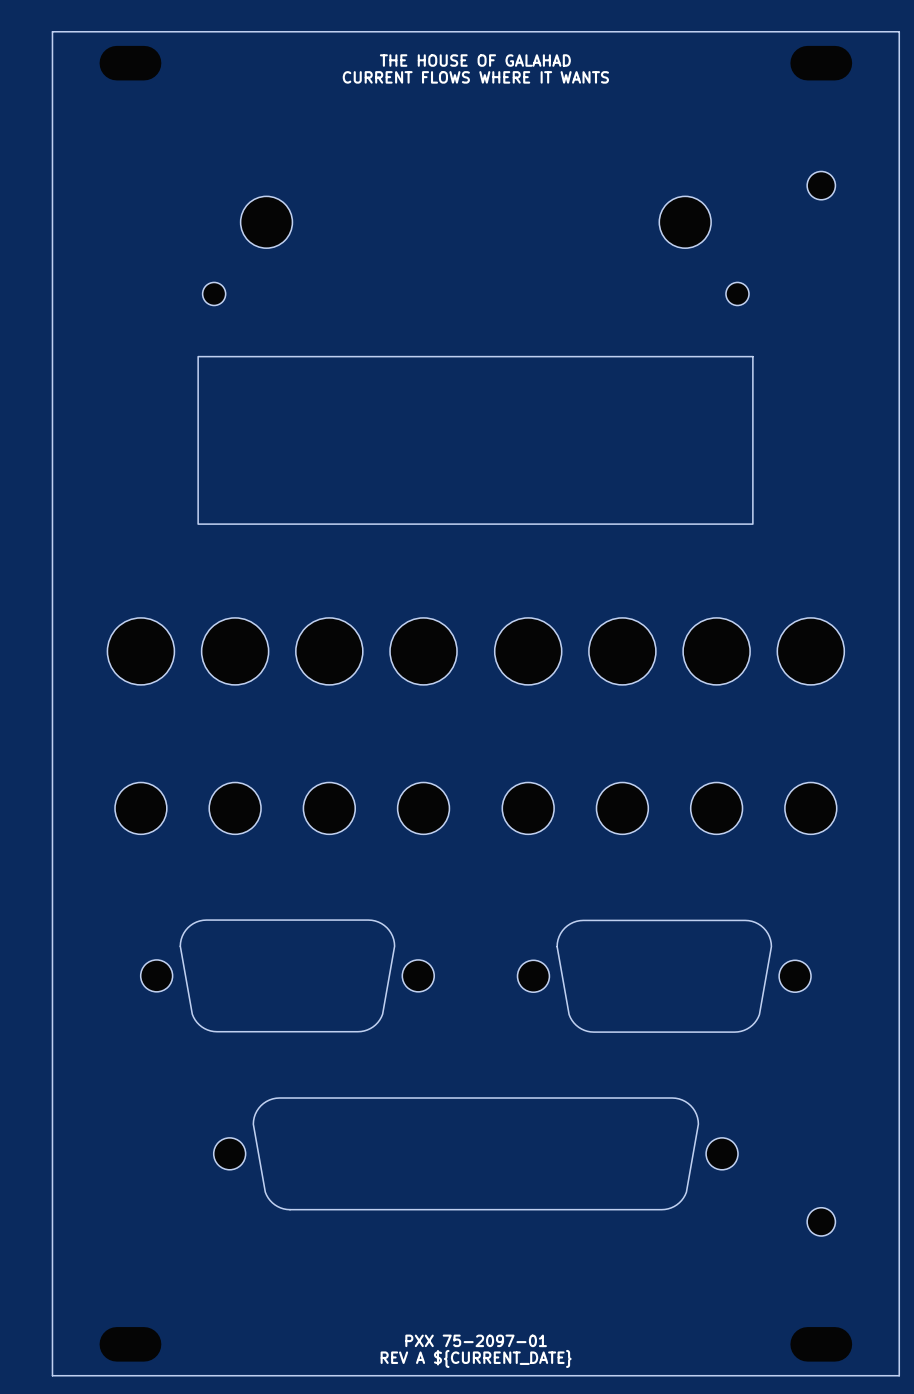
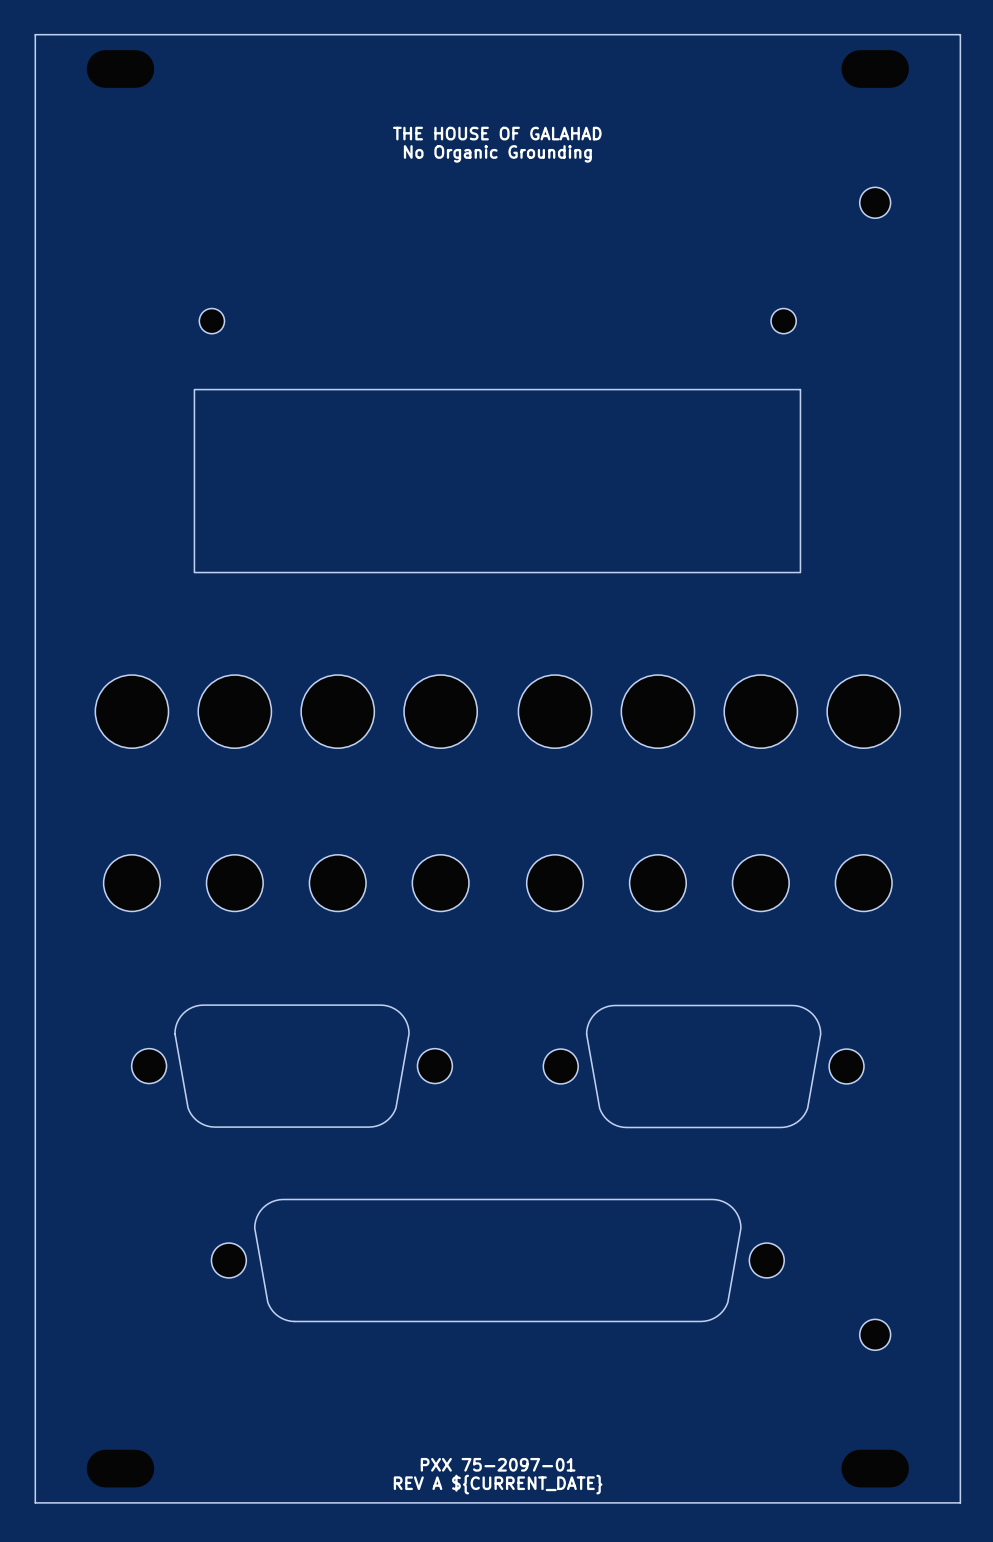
text position: THE HOUSE OF GALAHAD (475, 60) -> THE HOUSE OF GALAHAD (497, 133)
text: CURRENT FLOWS WHERE IT WANTS (475, 77) -> none
text: none -> No Organic Grounding (497, 153)
part: (266, 222) -> none
part: (685, 222) -> none

